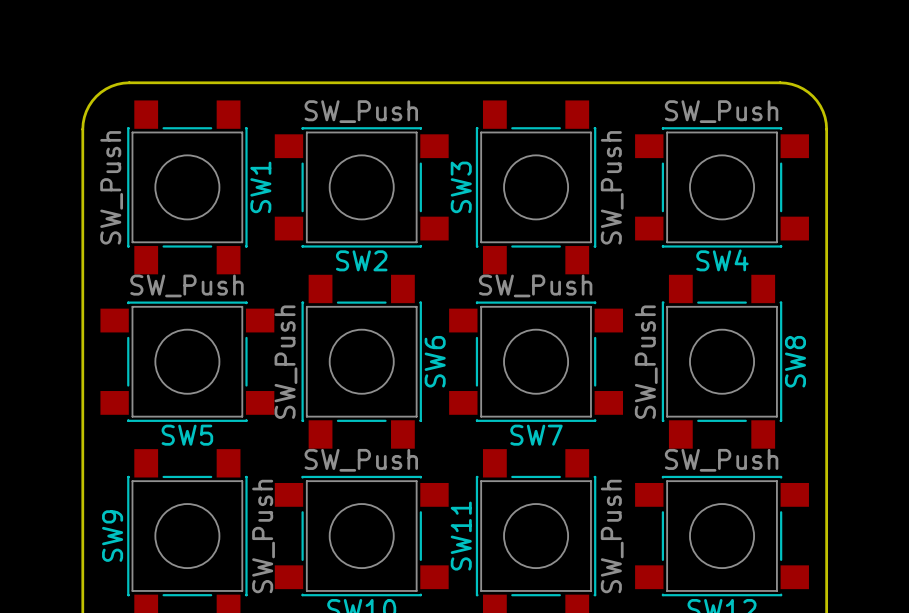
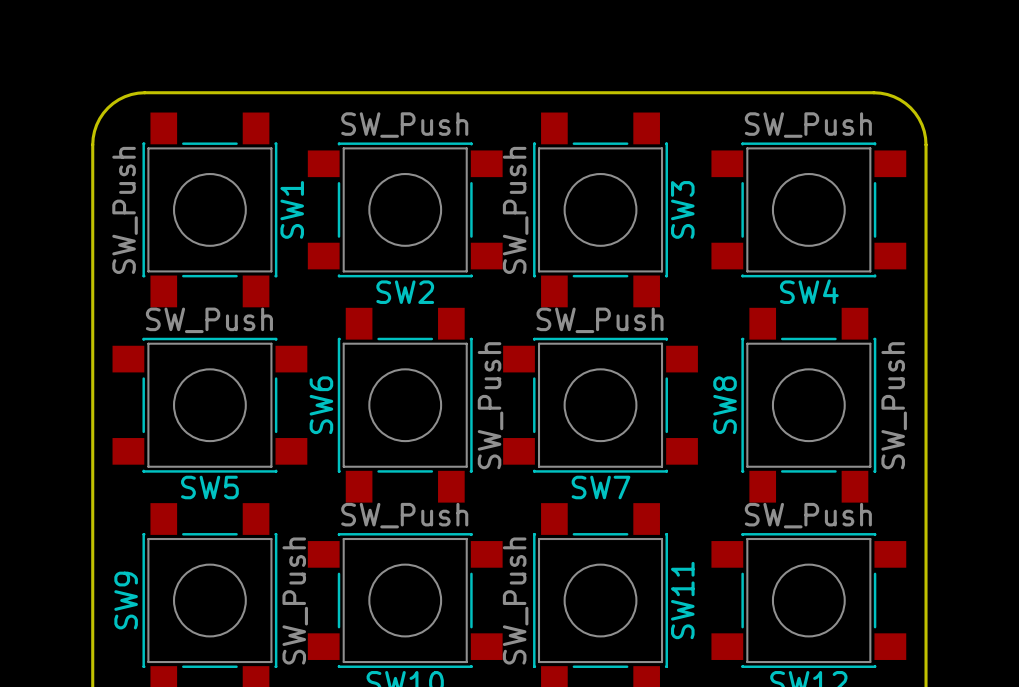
SW3 name position: SW3 (461, 187) -> SW3 (682, 209)
SW3 value position: SW_Push (612, 187) -> SW_Push (515, 210)
SW6 name position: SW6 (435, 361) -> SW6 (321, 405)
SW8 name position: SW8 (795, 361) -> SW8 (725, 405)
SW6 value position: SW_Push (285, 362) -> SW_Push (490, 405)
SW8 value position: SW_Push (646, 362) -> SW_Push (894, 405)
SW11 name position: SW11 (461, 536) -> SW11 (682, 600)
SW11 value position: SW_Push (612, 536) -> SW_Push (515, 601)

